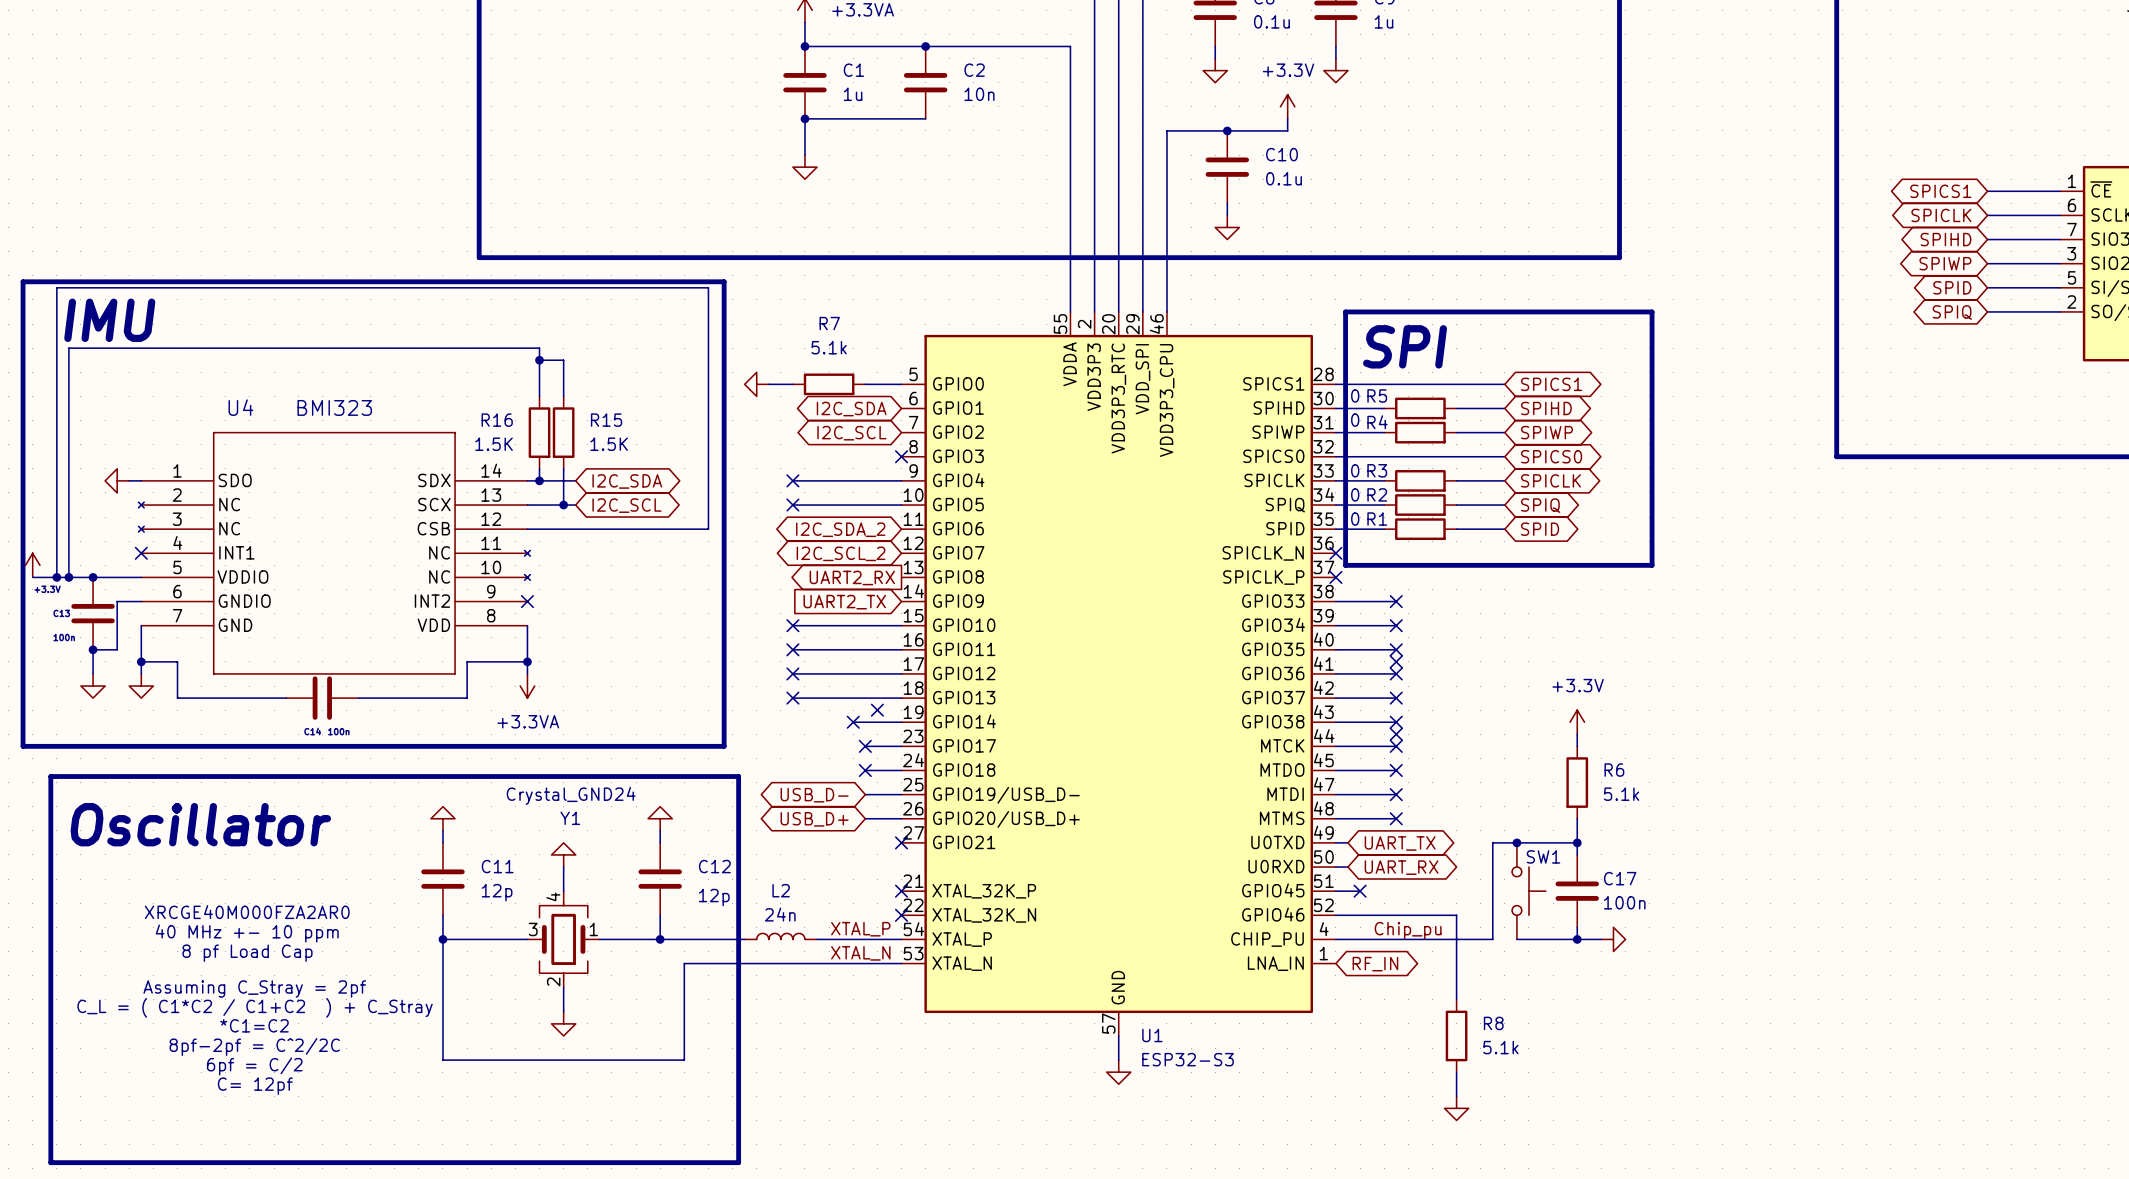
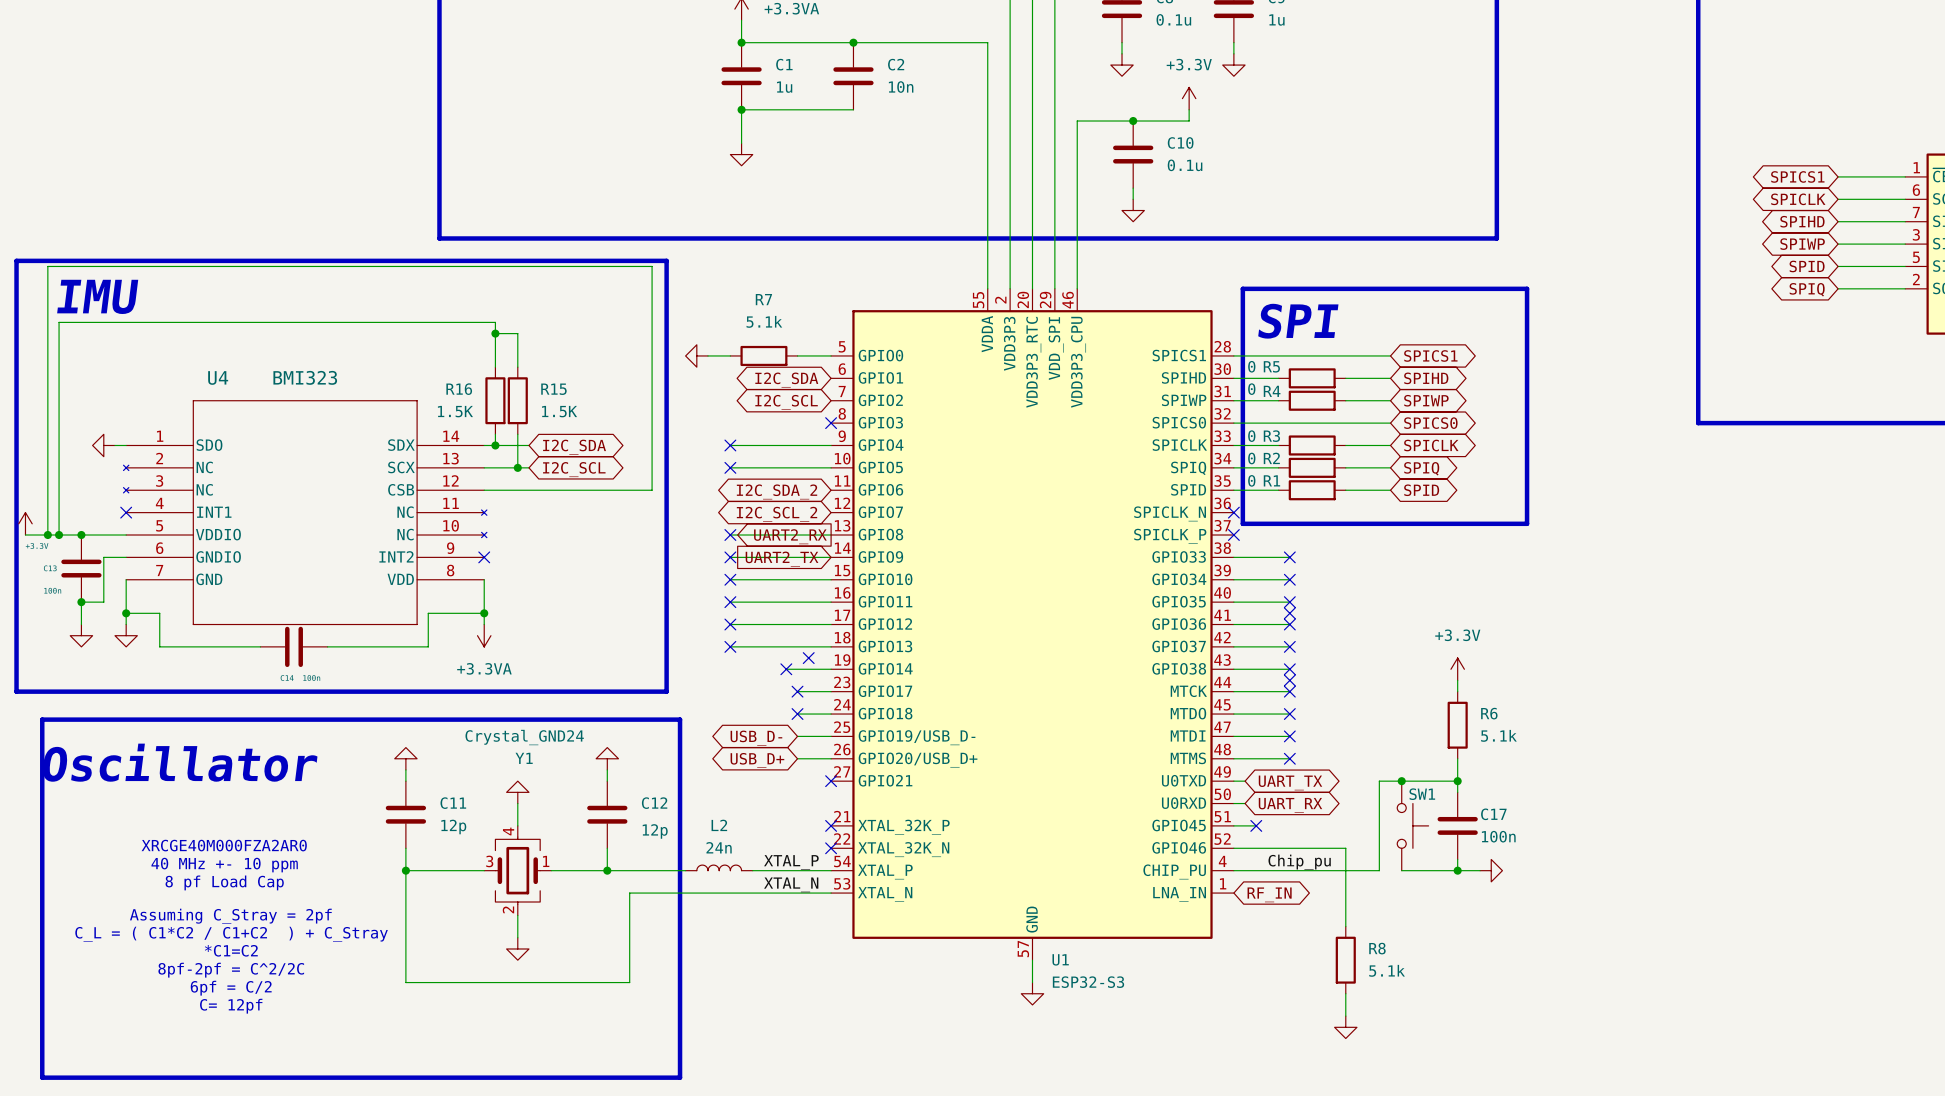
wire: none -> (730, 535) (831, 535)
no-connect mark: none -> (730, 535)
wire: none -> (730, 557) (831, 557)
no-connect mark: none -> (730, 557)

